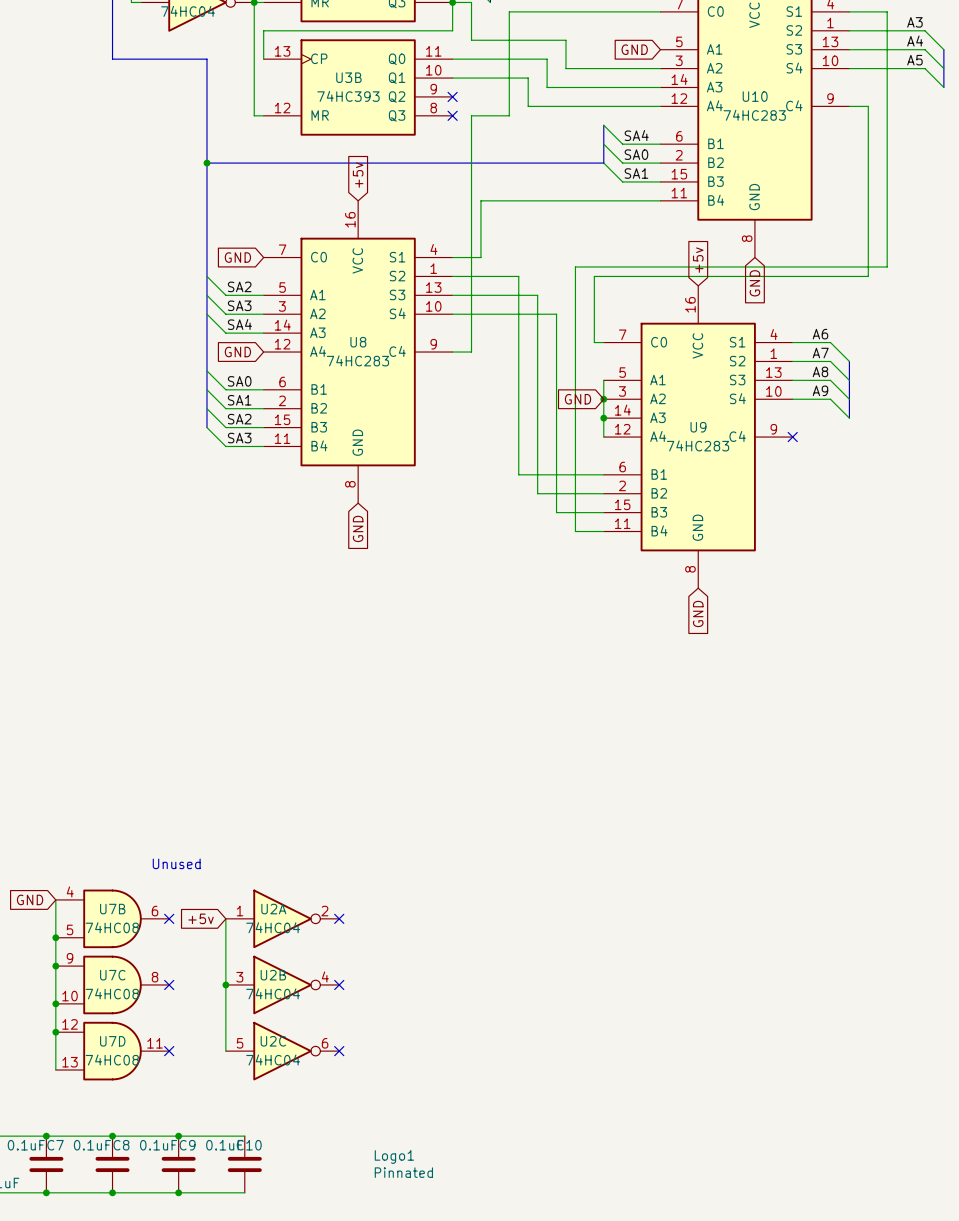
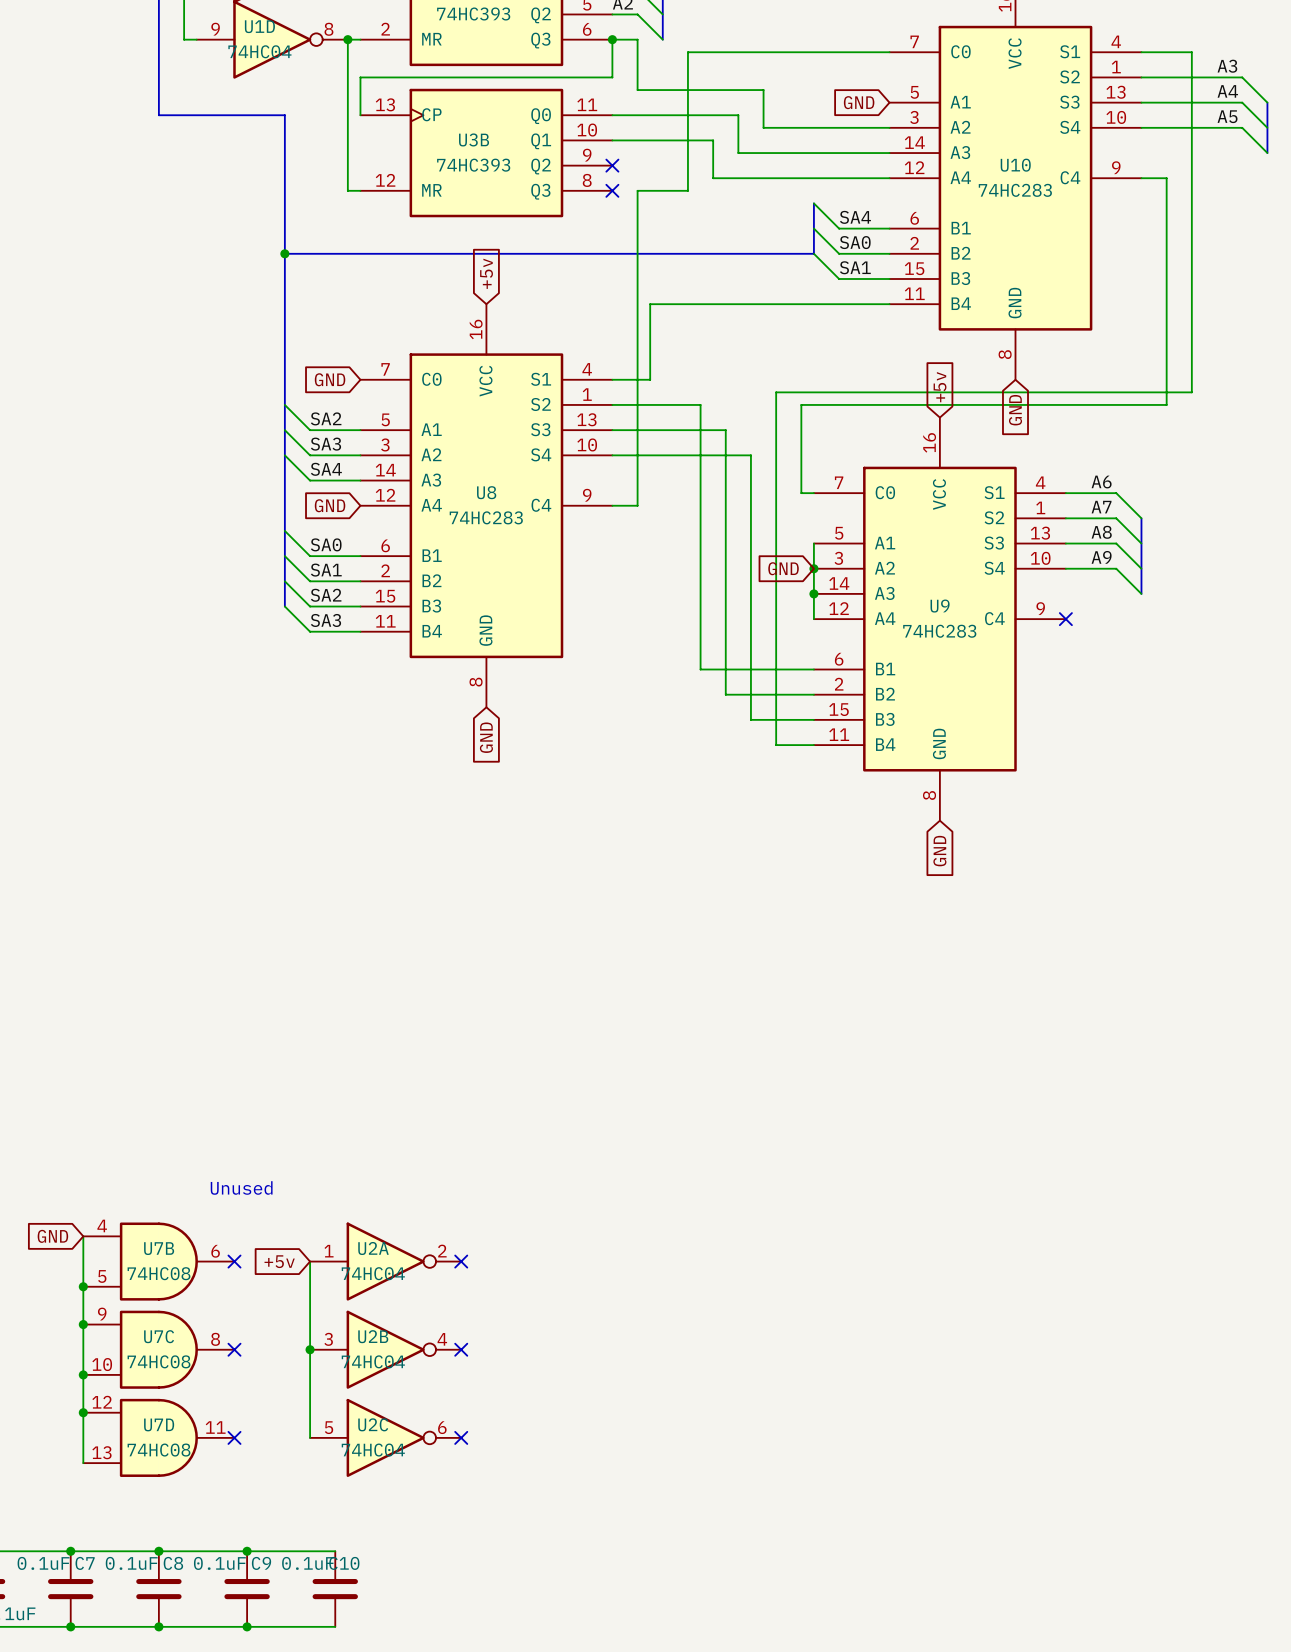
Logo1: Pinnated (403, 1164) -> none

